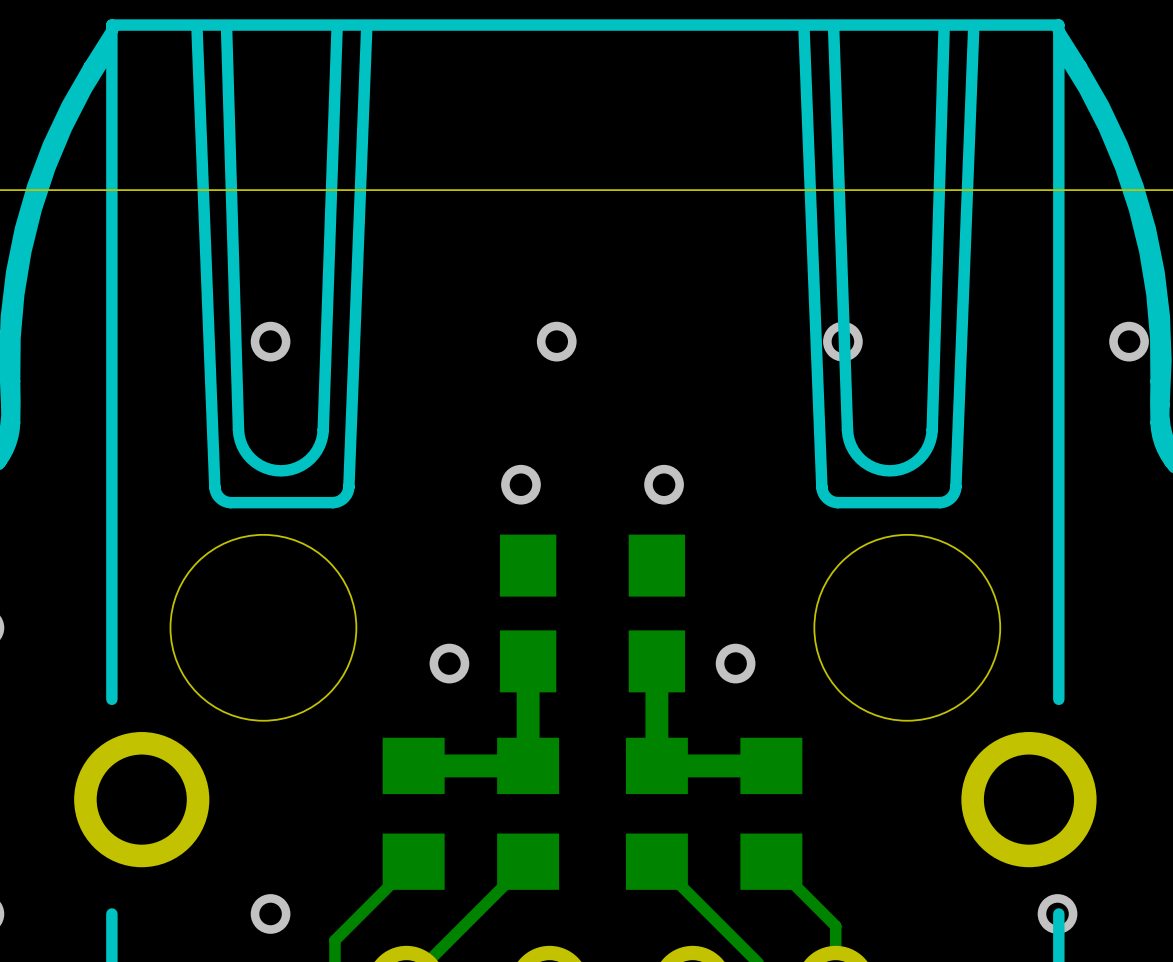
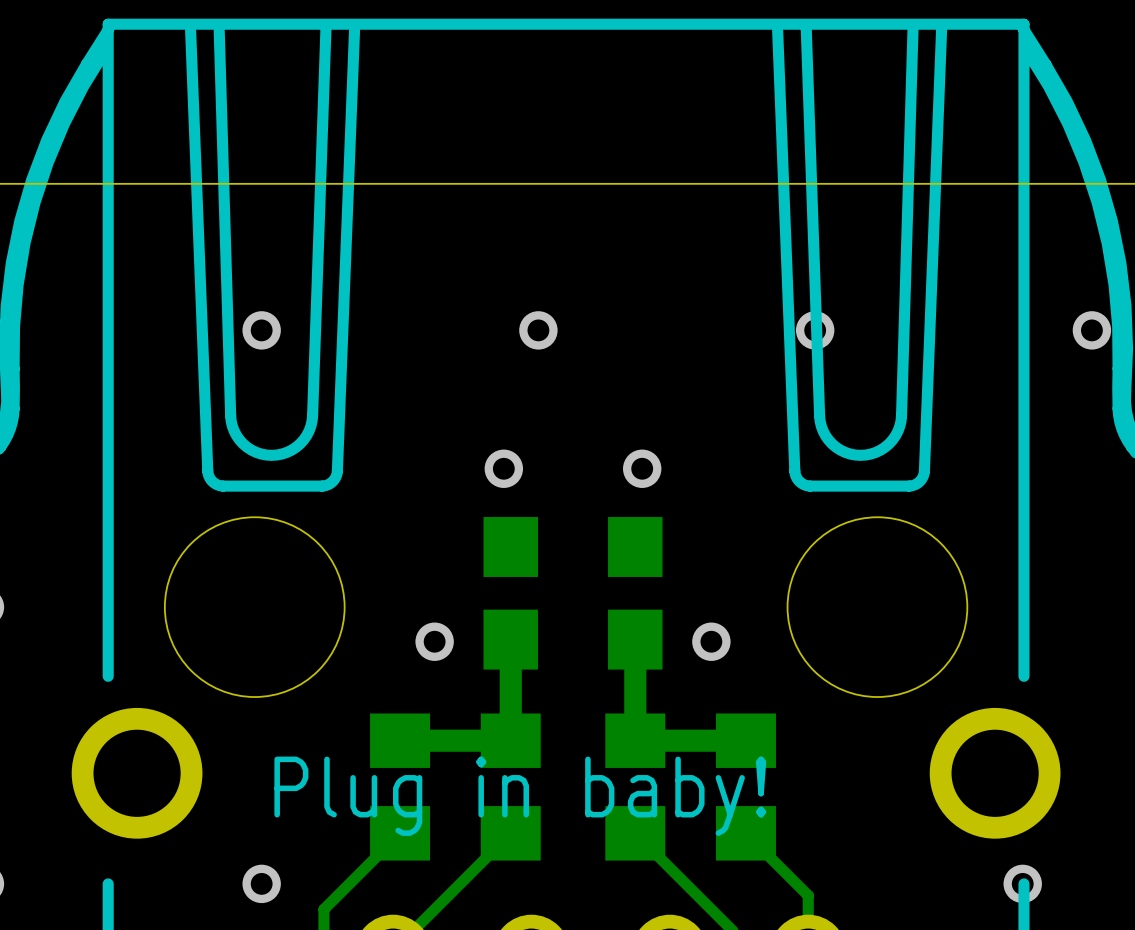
text: none -> Plug in baby! (520, 796)

